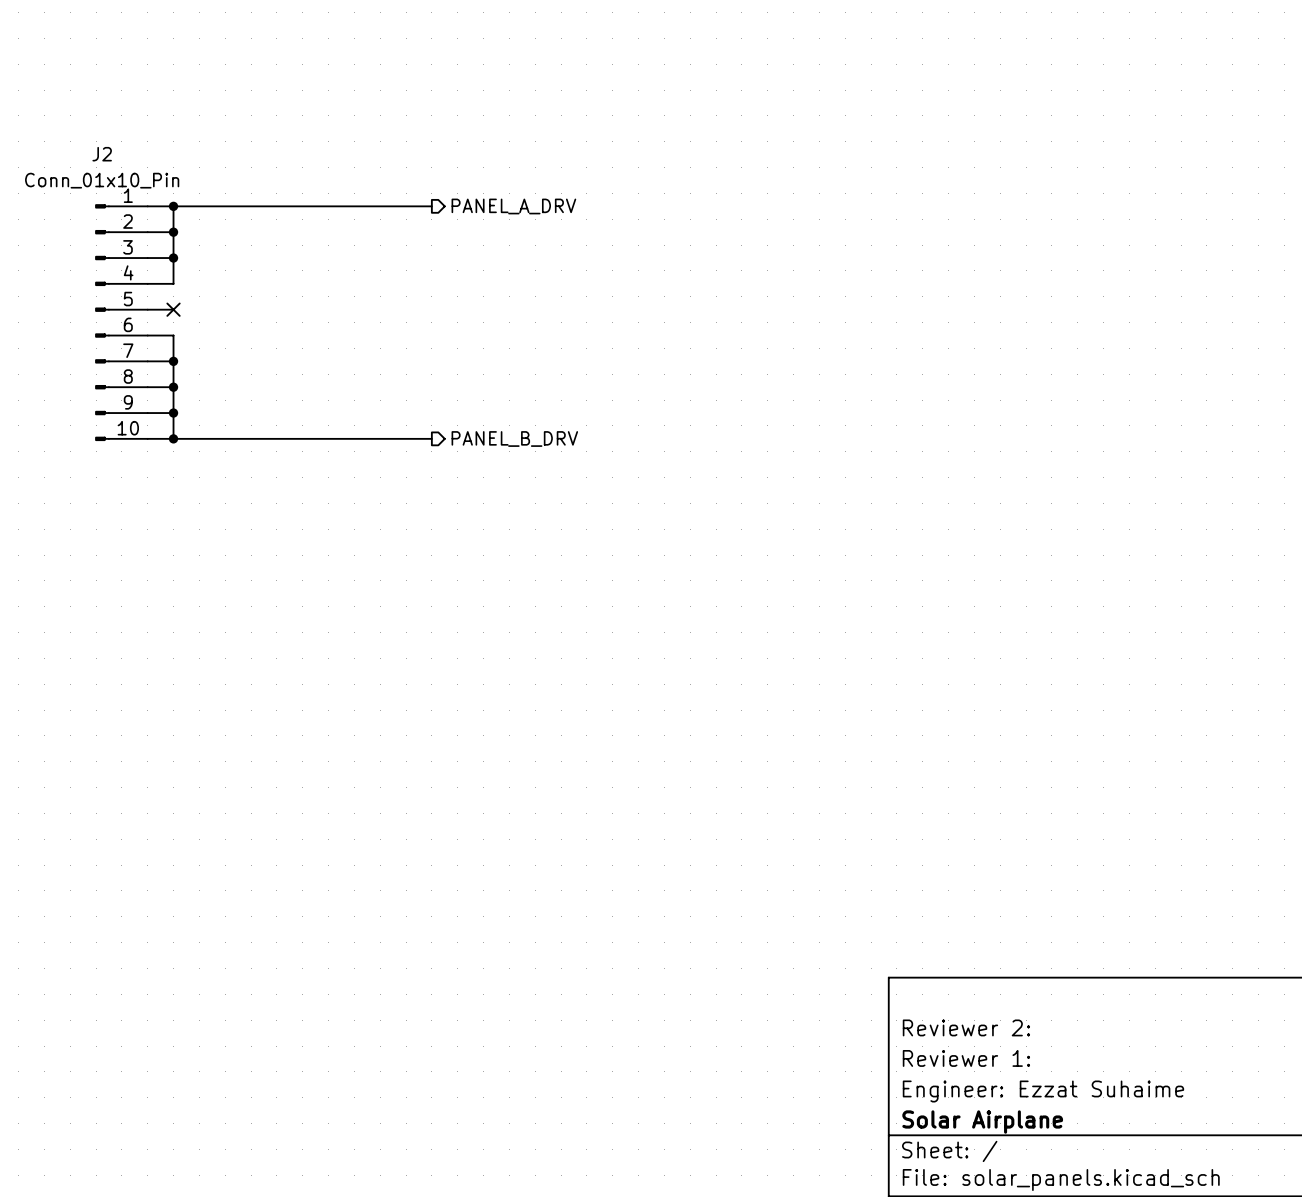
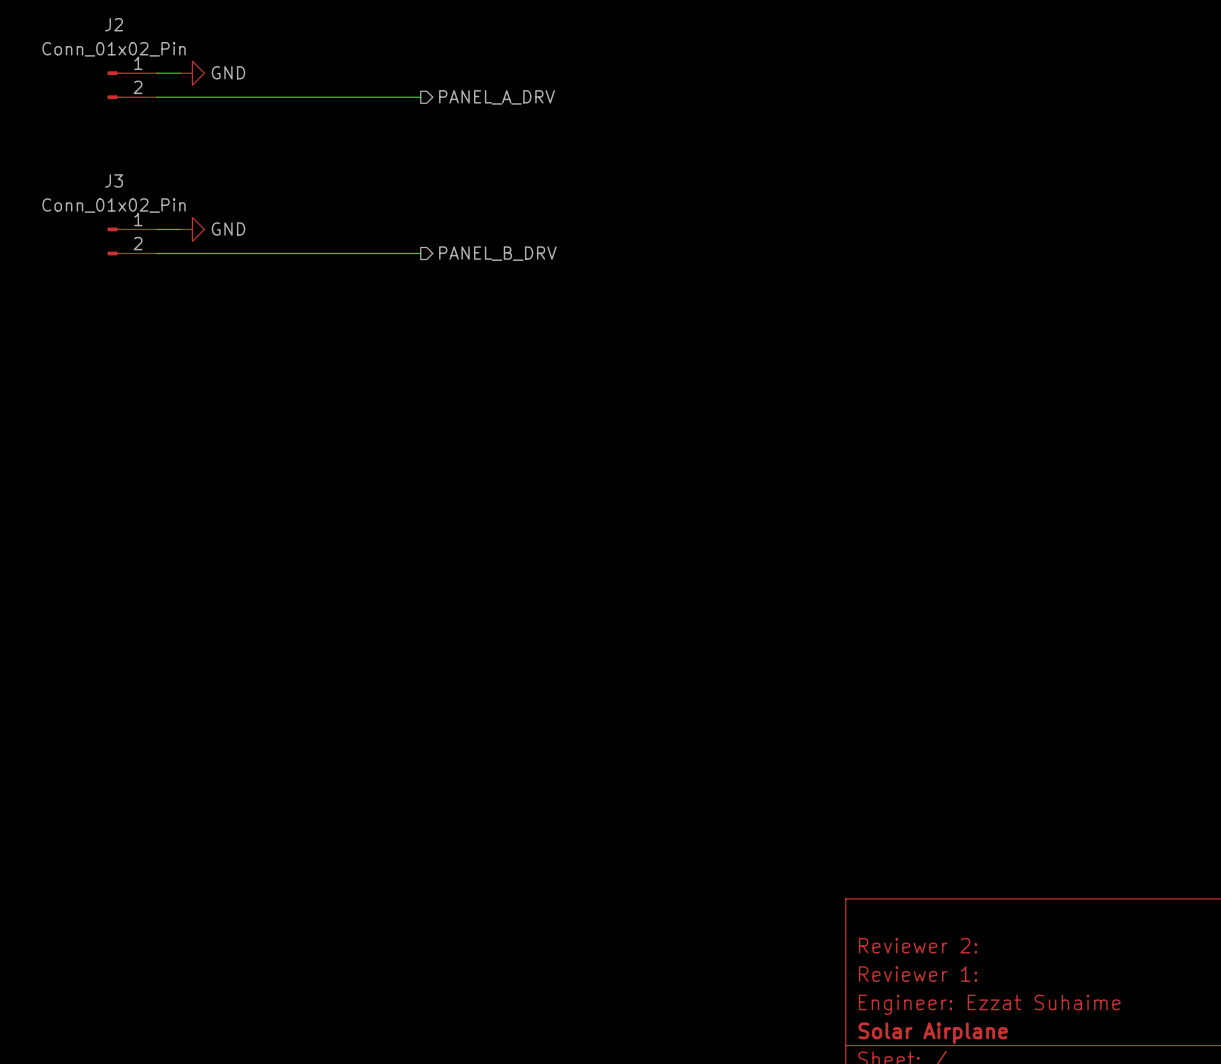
power symbol: none -> GND (192, 73)
J2 name position: J2 (102, 154) -> J2 (114, 24)
J2 value: Conn_01x10_Pin (102, 180) -> Conn_01x02_Pin (114, 49)
J2 symbol: [95, 204, 148, 441] -> [107, 71, 157, 100]
wire: (147, 206) (431, 206) -> (156, 97) (420, 97)
wire: (173, 206) (173, 283) -> (420, 253) (180, 253)
junction: (173, 206) -> none
hierarchical label position: PANEL_A_DRV (513, 206) -> PANEL_A_DRV (497, 97)
wire: (147, 232) (173, 232) -> (156, 73) (180, 73)
junction: (173, 232) -> none
junction: (173, 258) -> none
power symbol: none -> GND (192, 229)
J3: none -> Conn_01x02_Pin (131, 241)
wire: (147, 309) (173, 309) -> none
no-connect mark: (173, 309) -> none
wire: (147, 335) (173, 335) (173, 438) -> none
wire: (147, 361) (173, 361) -> none
junction: (173, 361) -> none
wire: (147, 387) (173, 387) -> none
junction: (173, 387) -> none
wire: (147, 413) (173, 413) -> none
junction: (173, 413) -> none
wire: (147, 438) (431, 438) -> none
junction: (173, 438) -> none
hierarchical label position: PANEL_B_DRV (514, 439) -> PANEL_B_DRV (497, 253)

